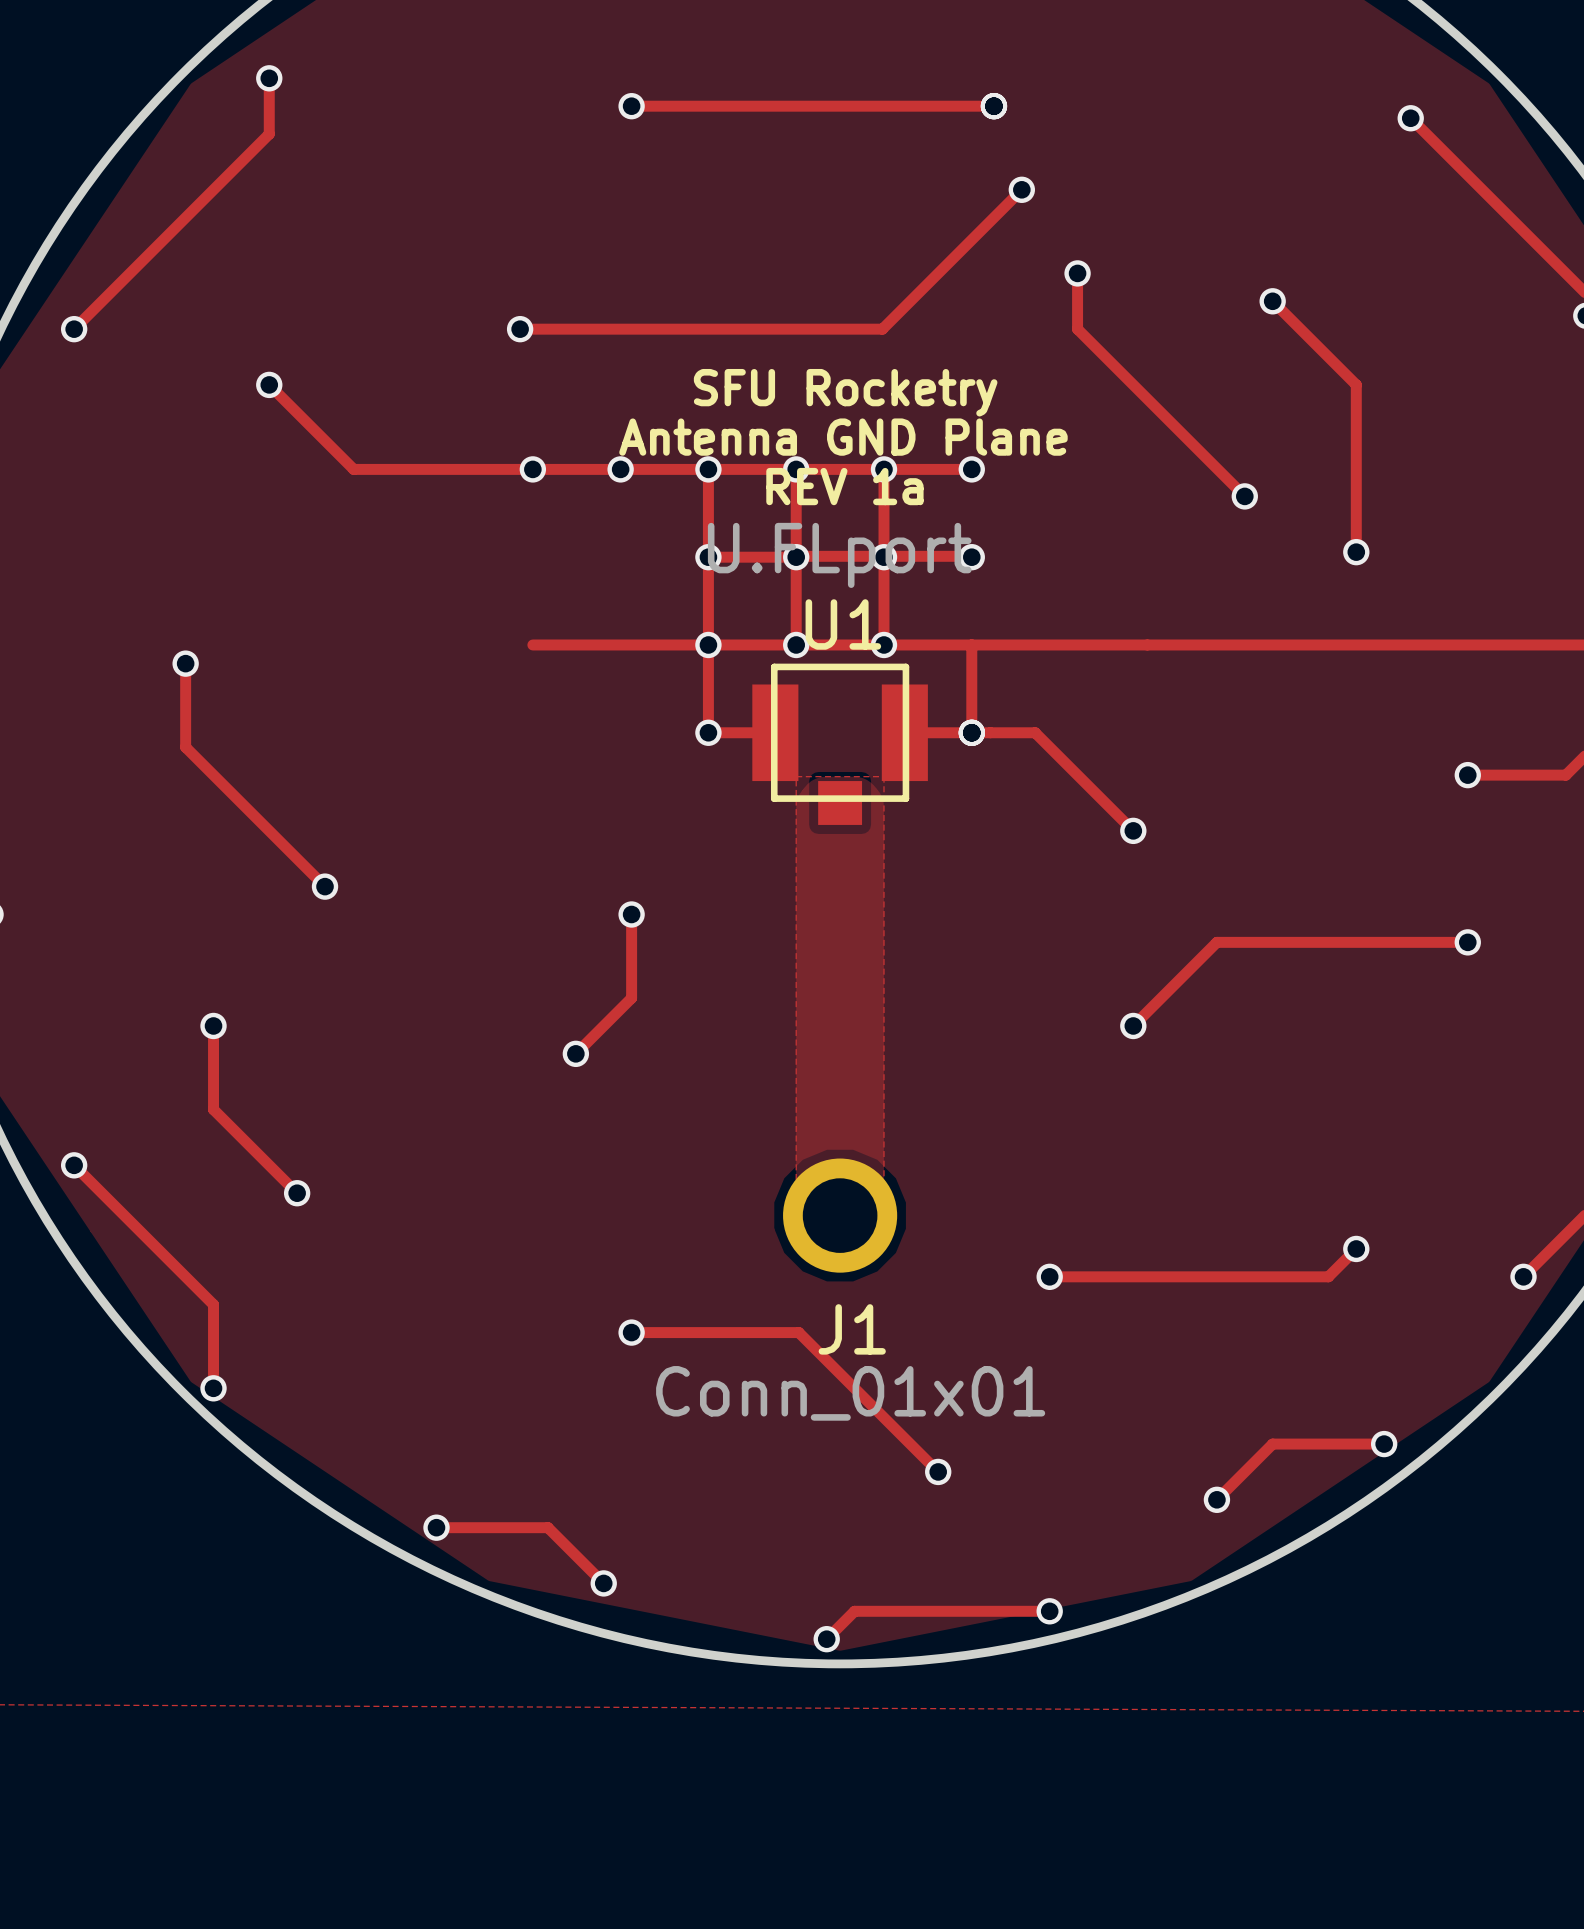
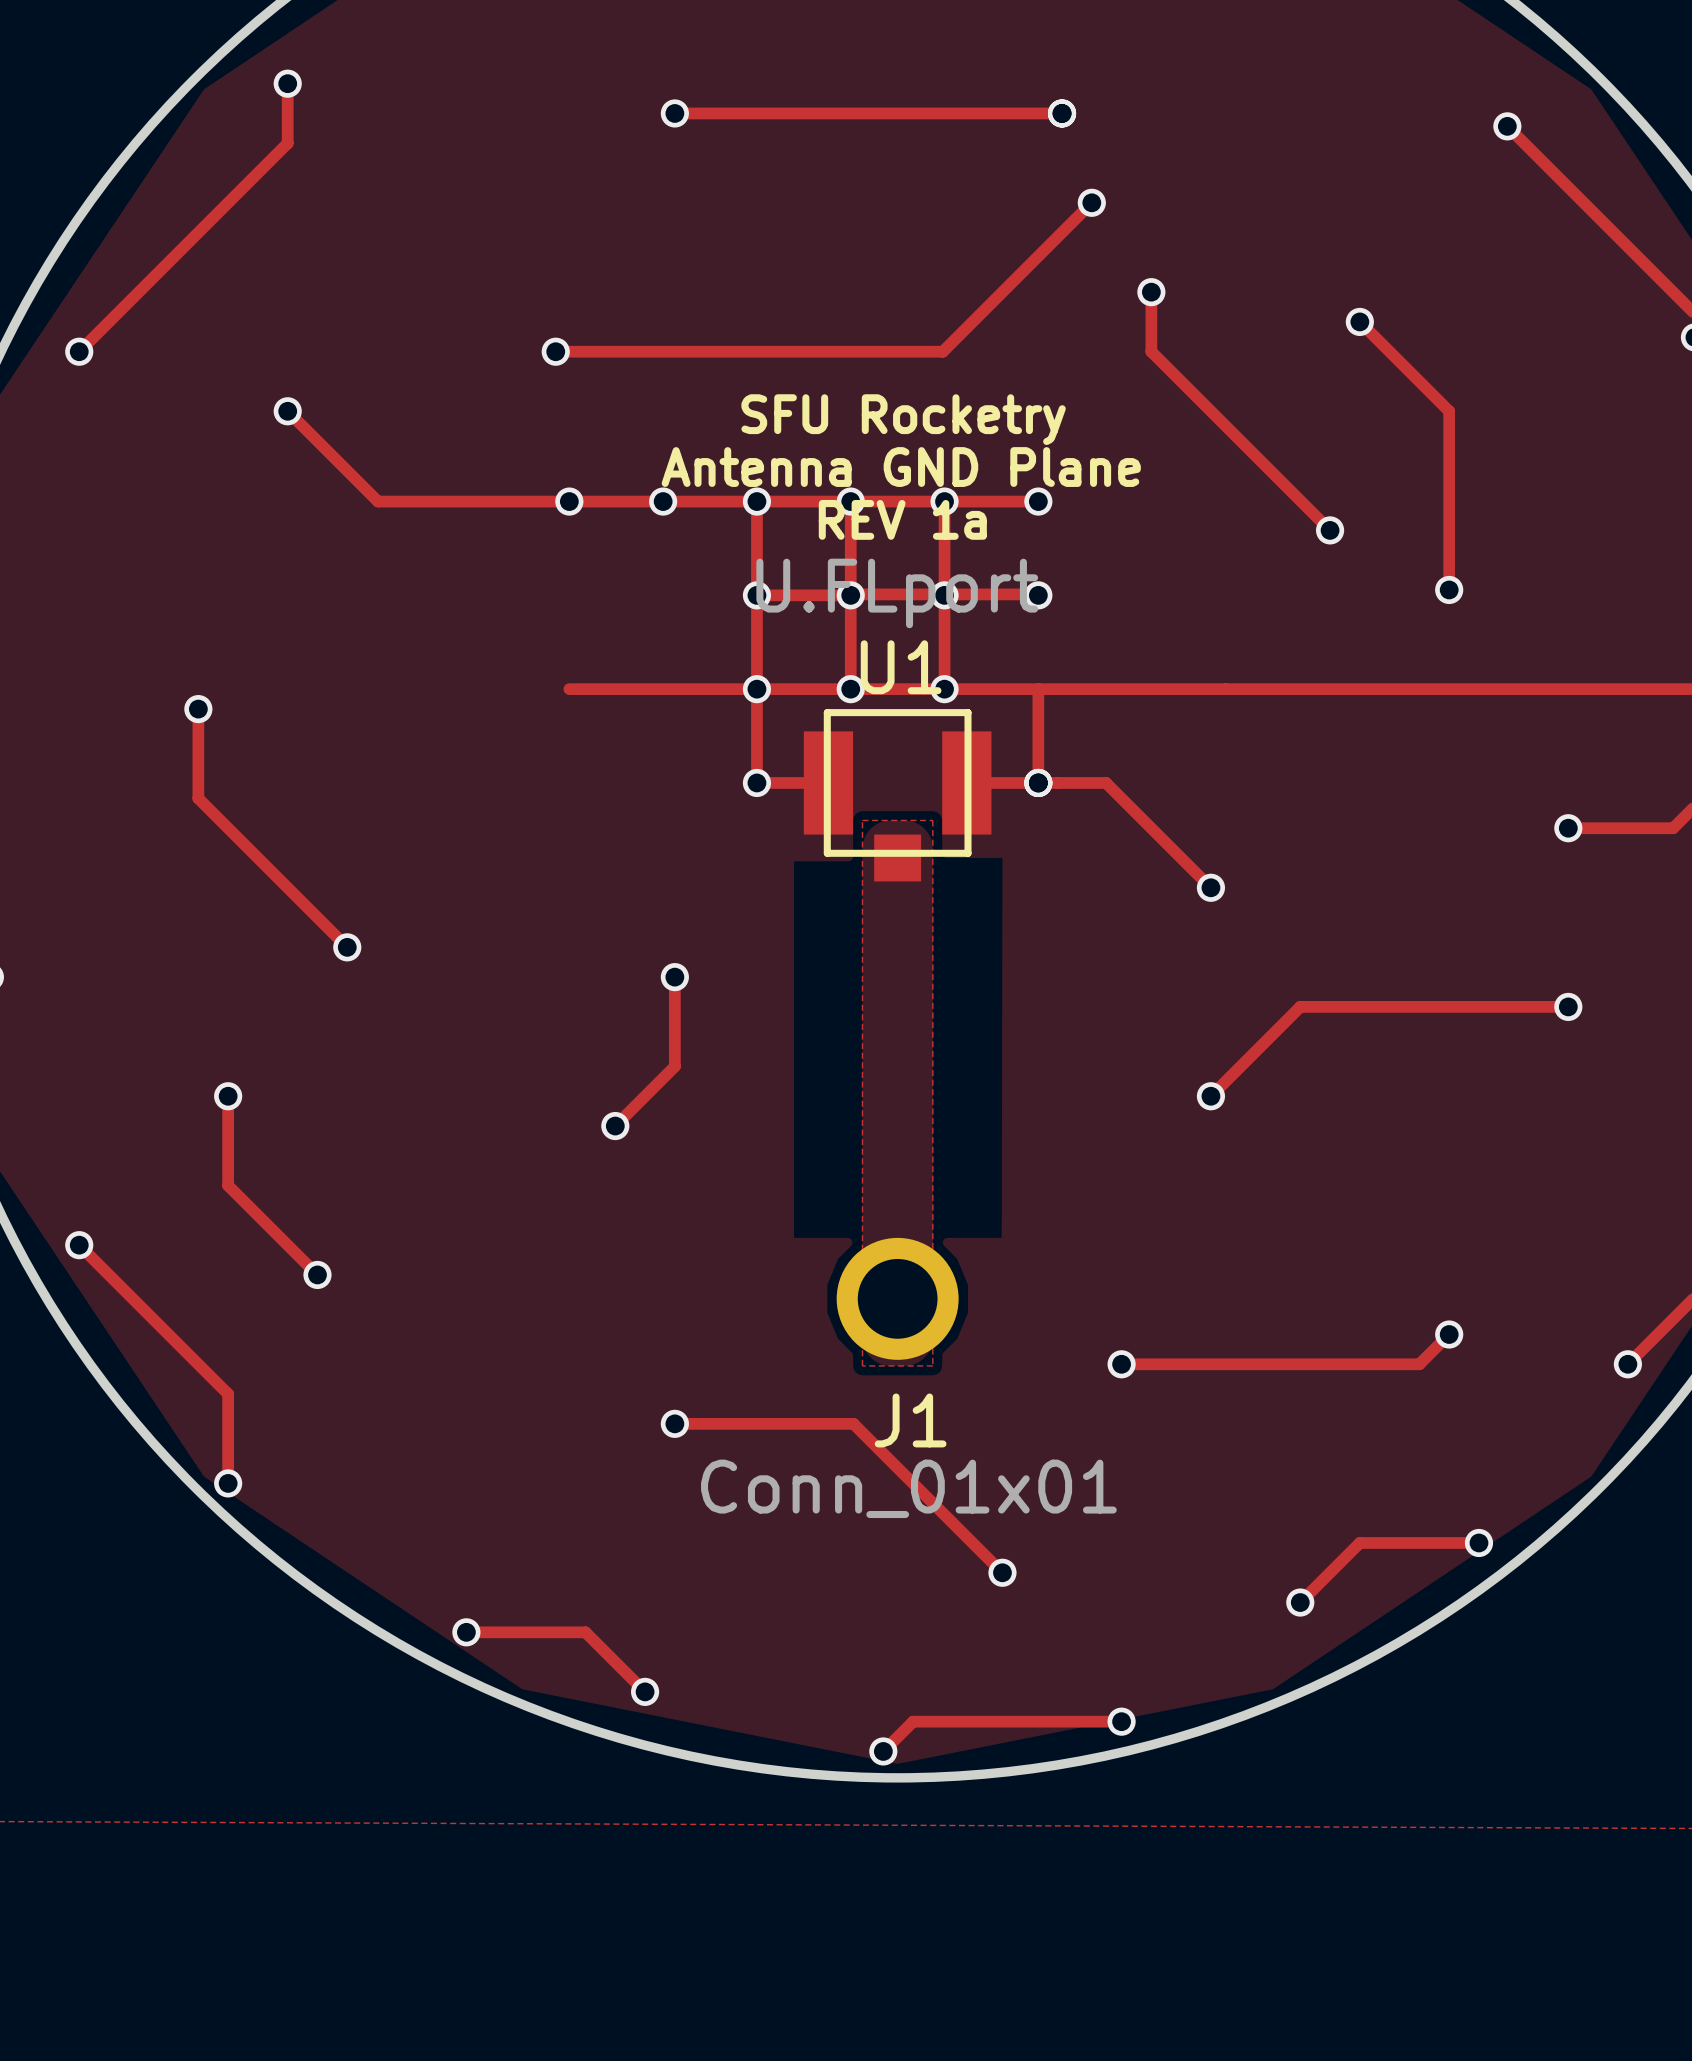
zone outline: (796, 776) (796, 1237) (884, 1237) (884, 776) (796, 776) -> (862, 820) (862, 1365) (932, 1365) (932, 820) (862, 820)

